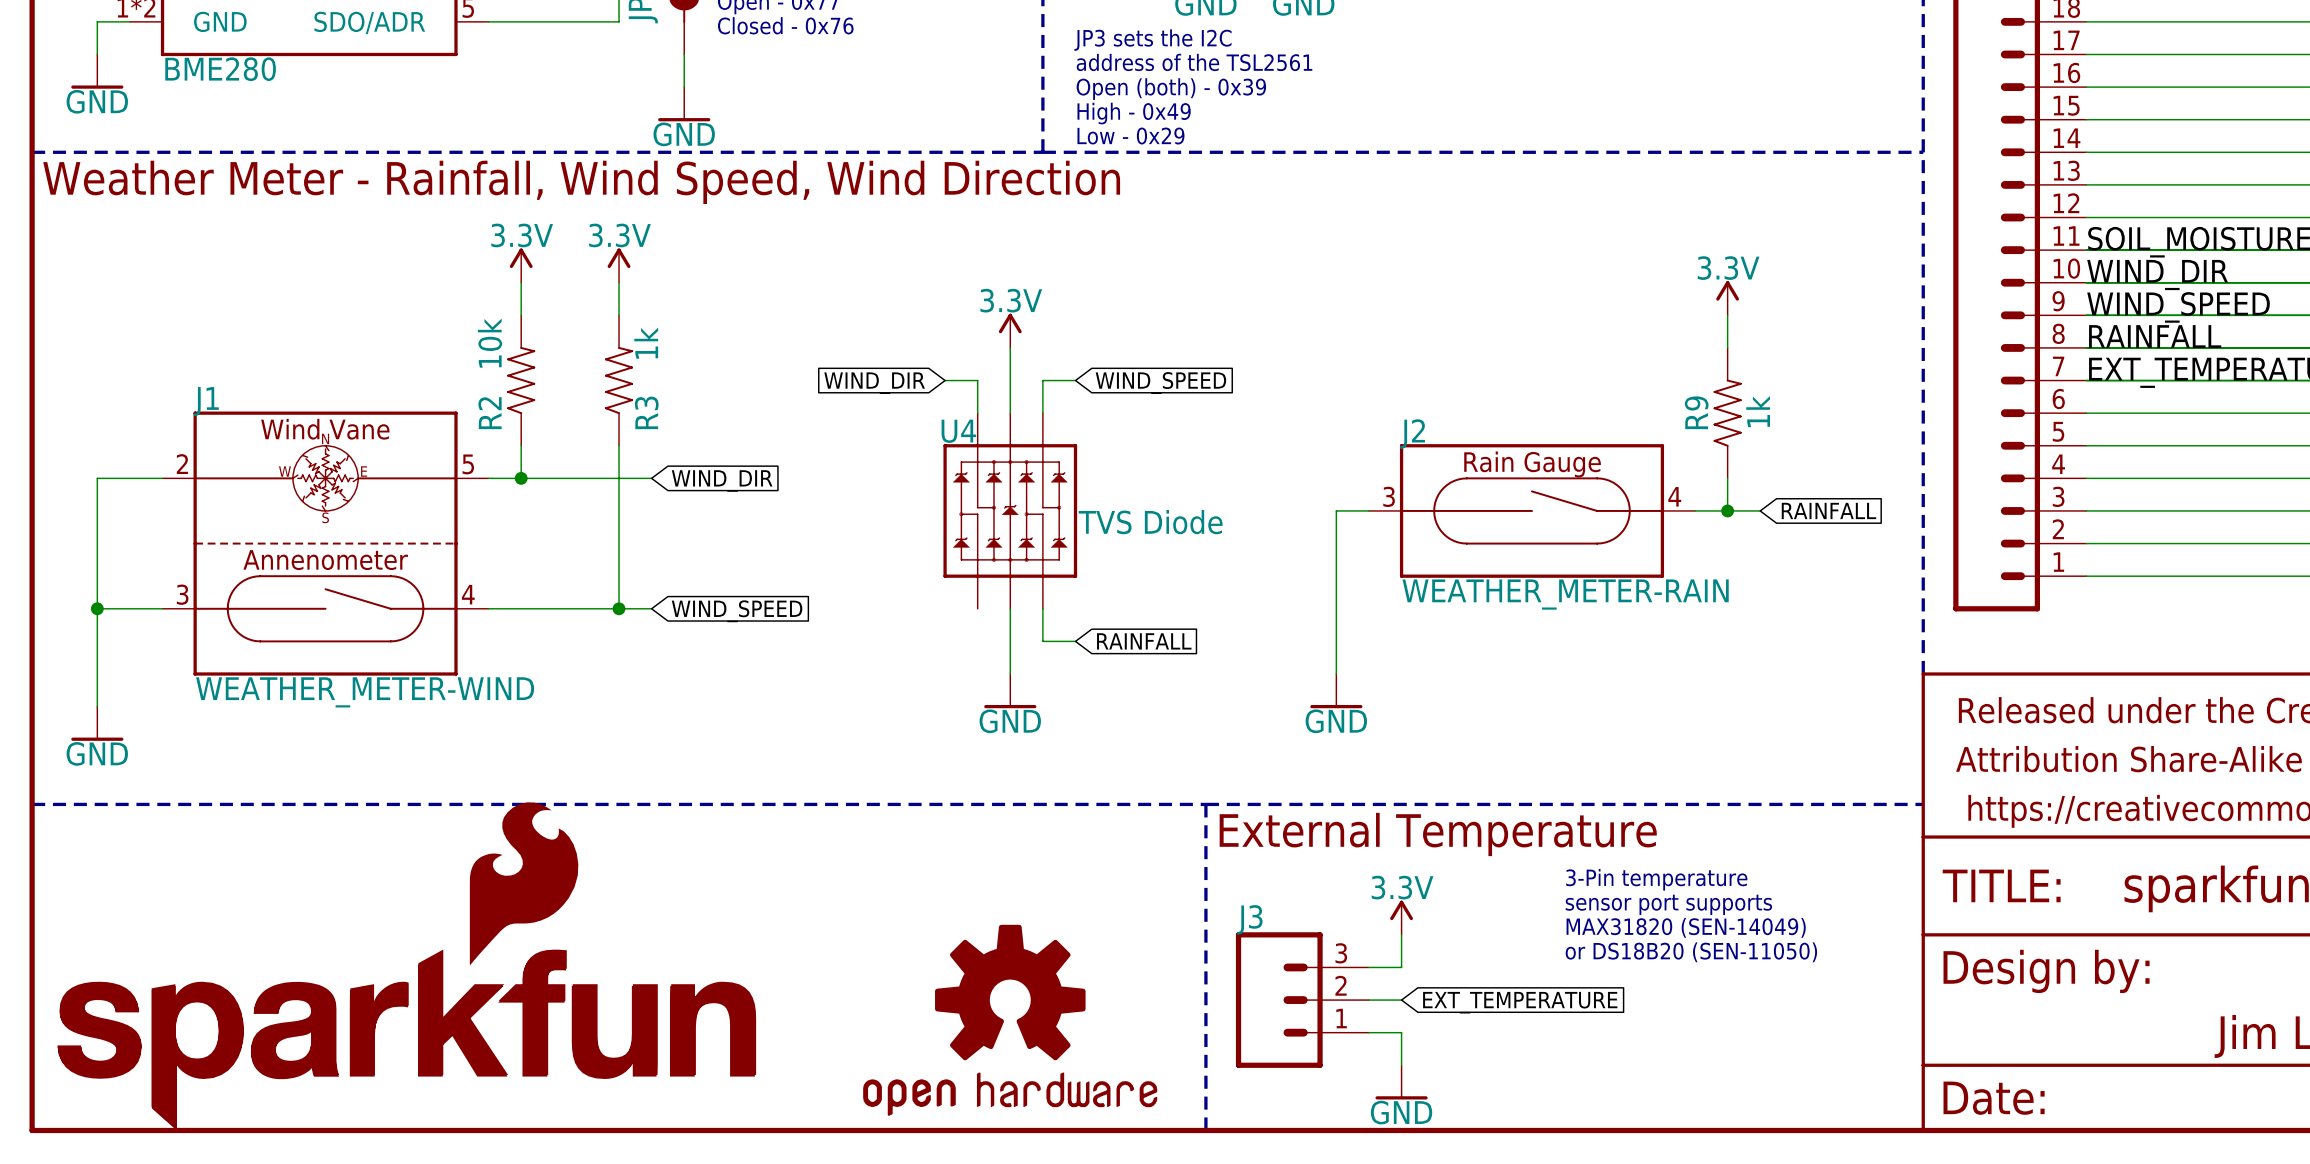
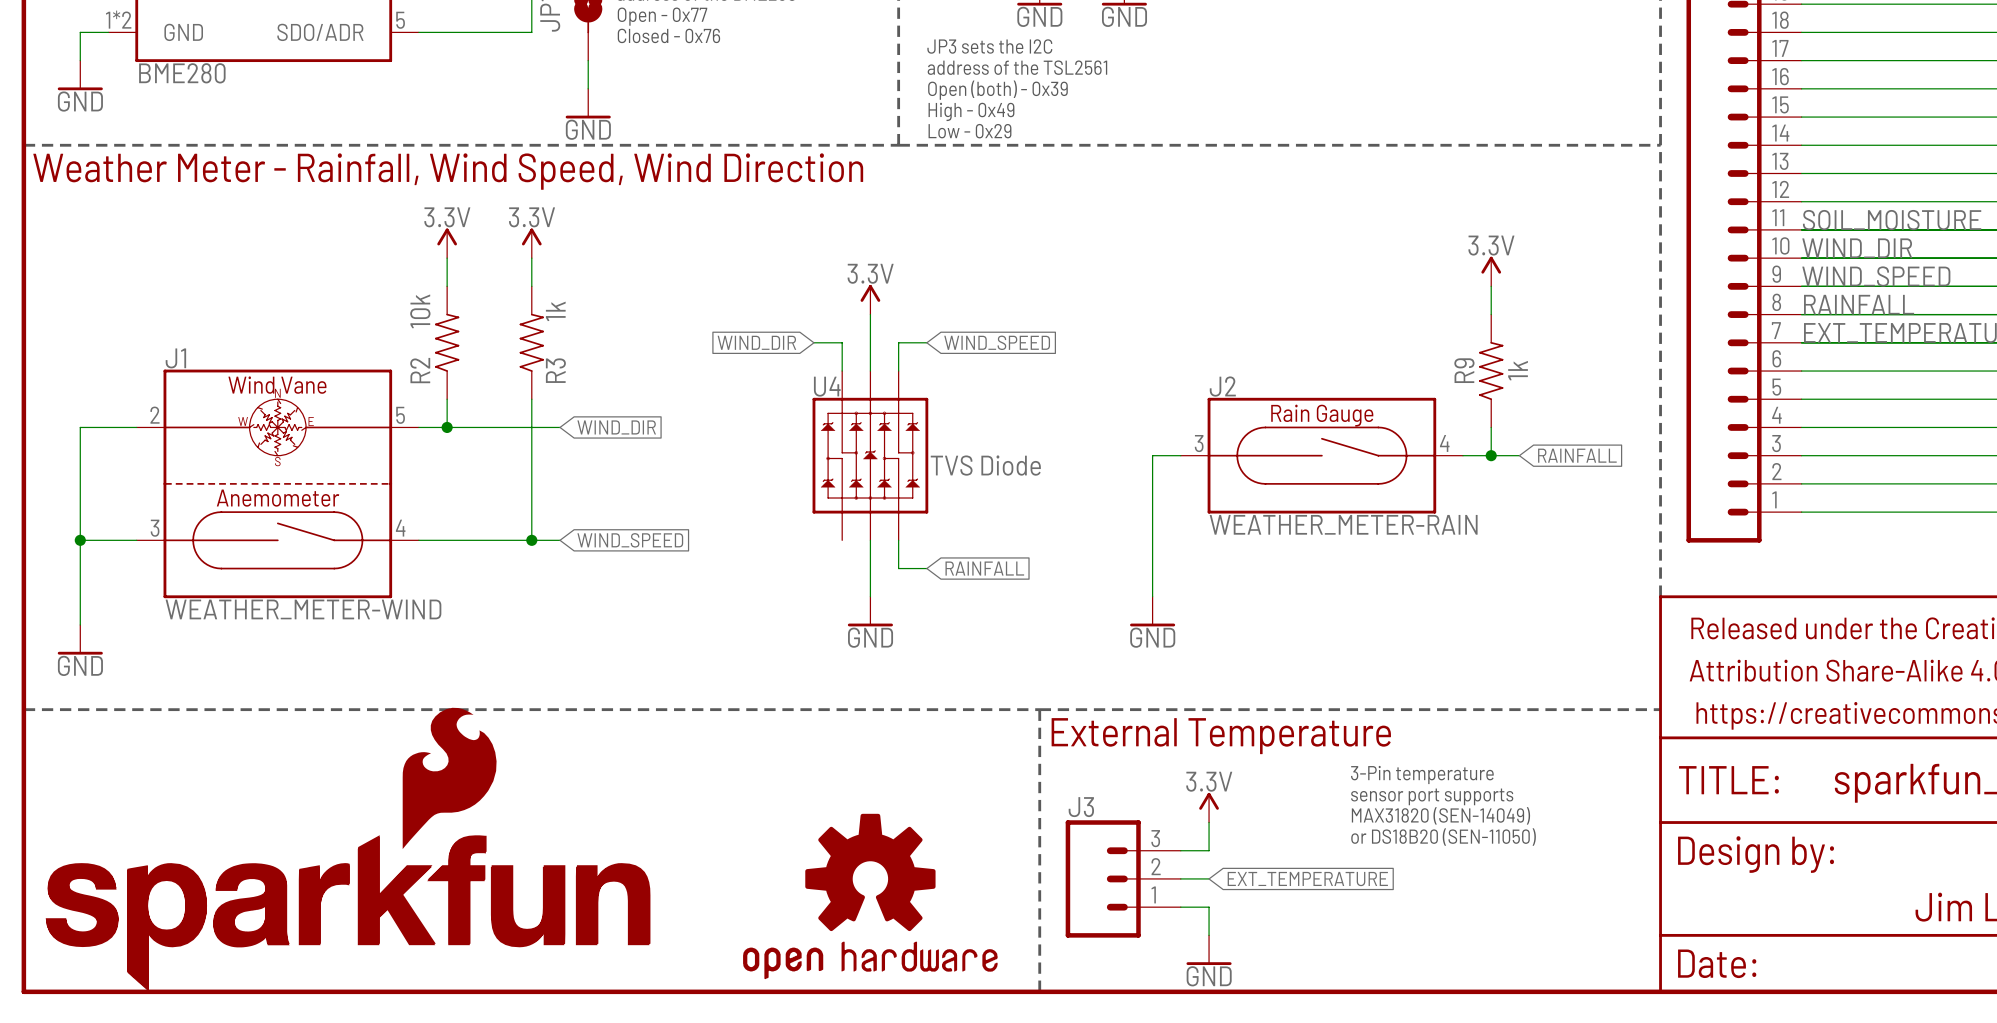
J1 text: Annenometer (325, 560) -> Anemometer (278, 498)

